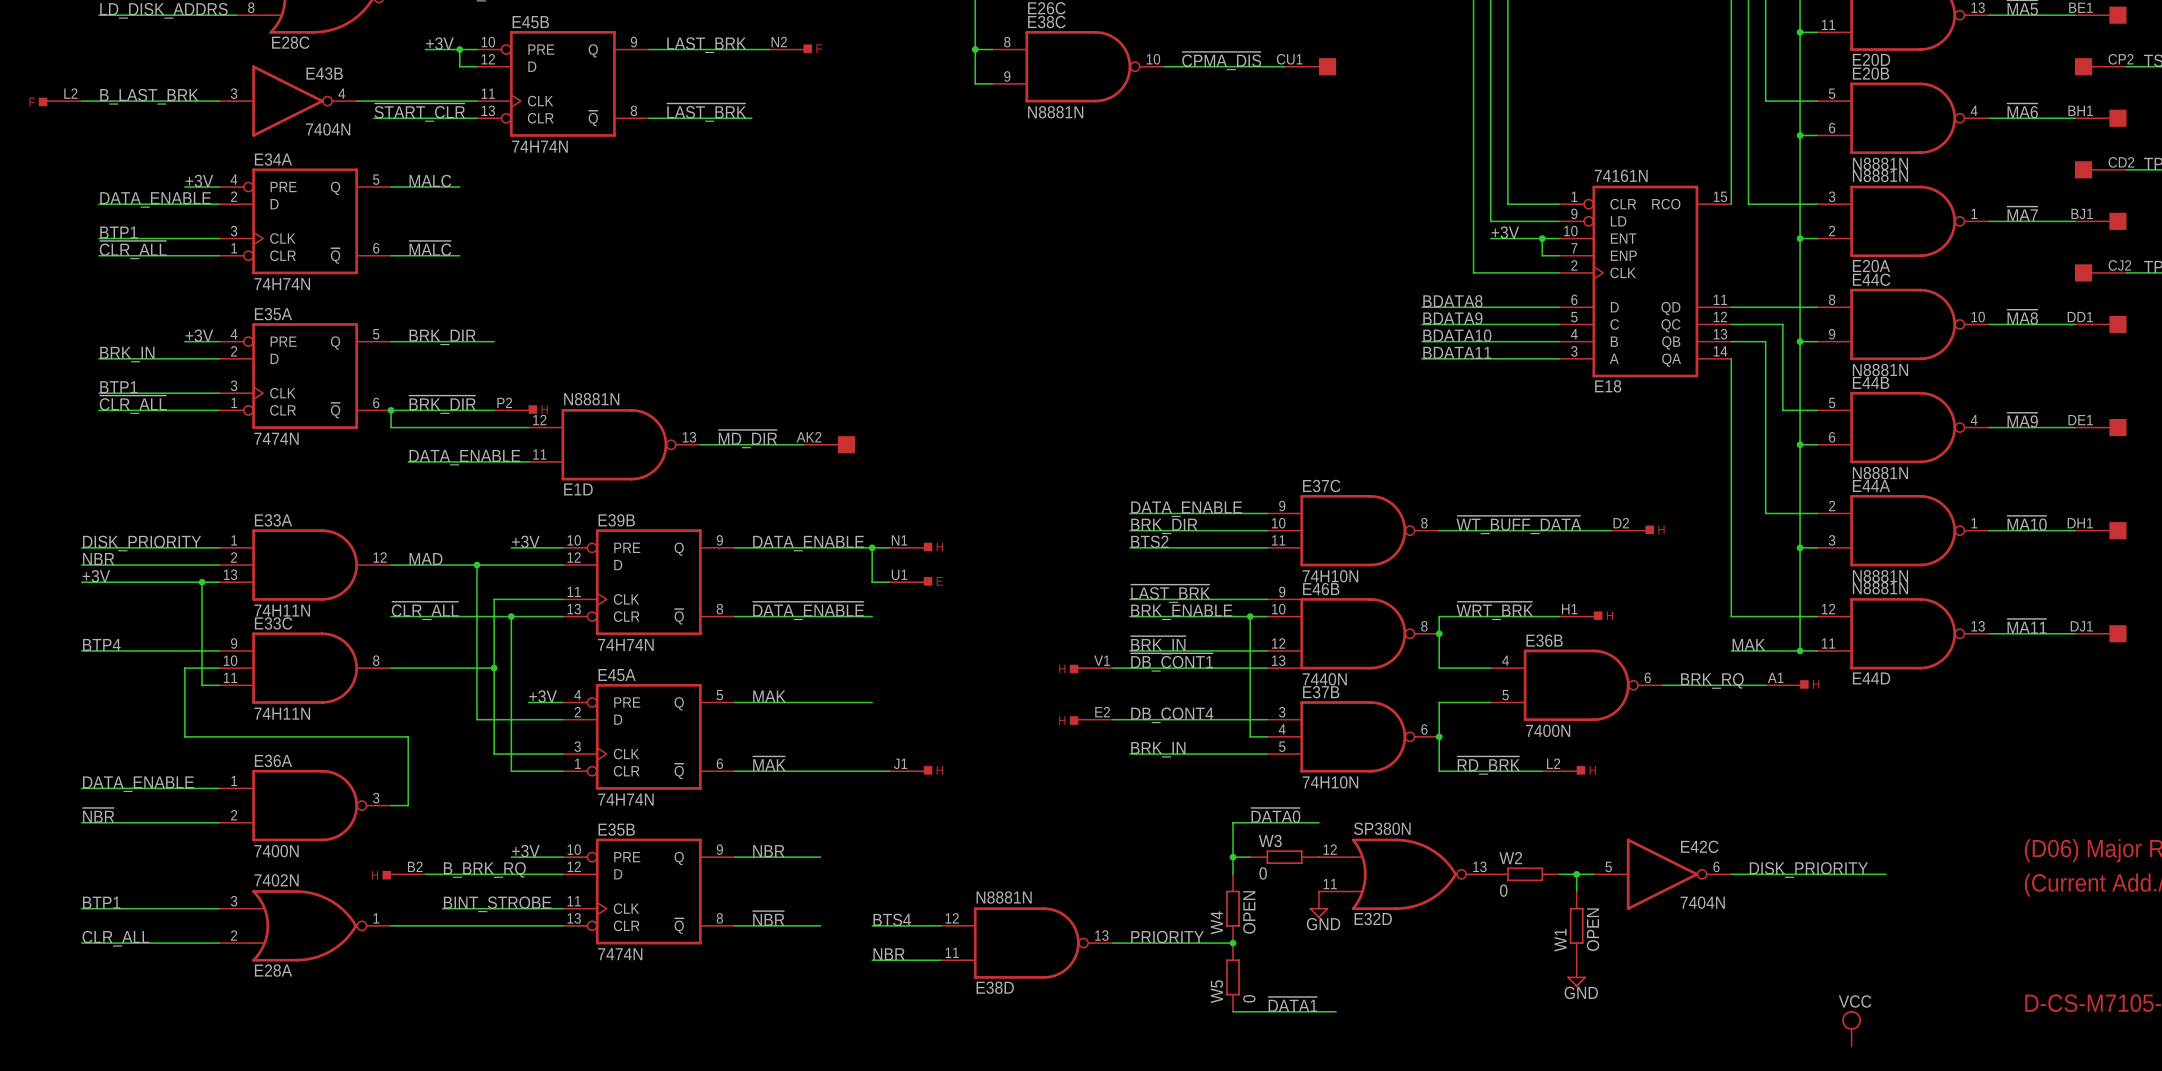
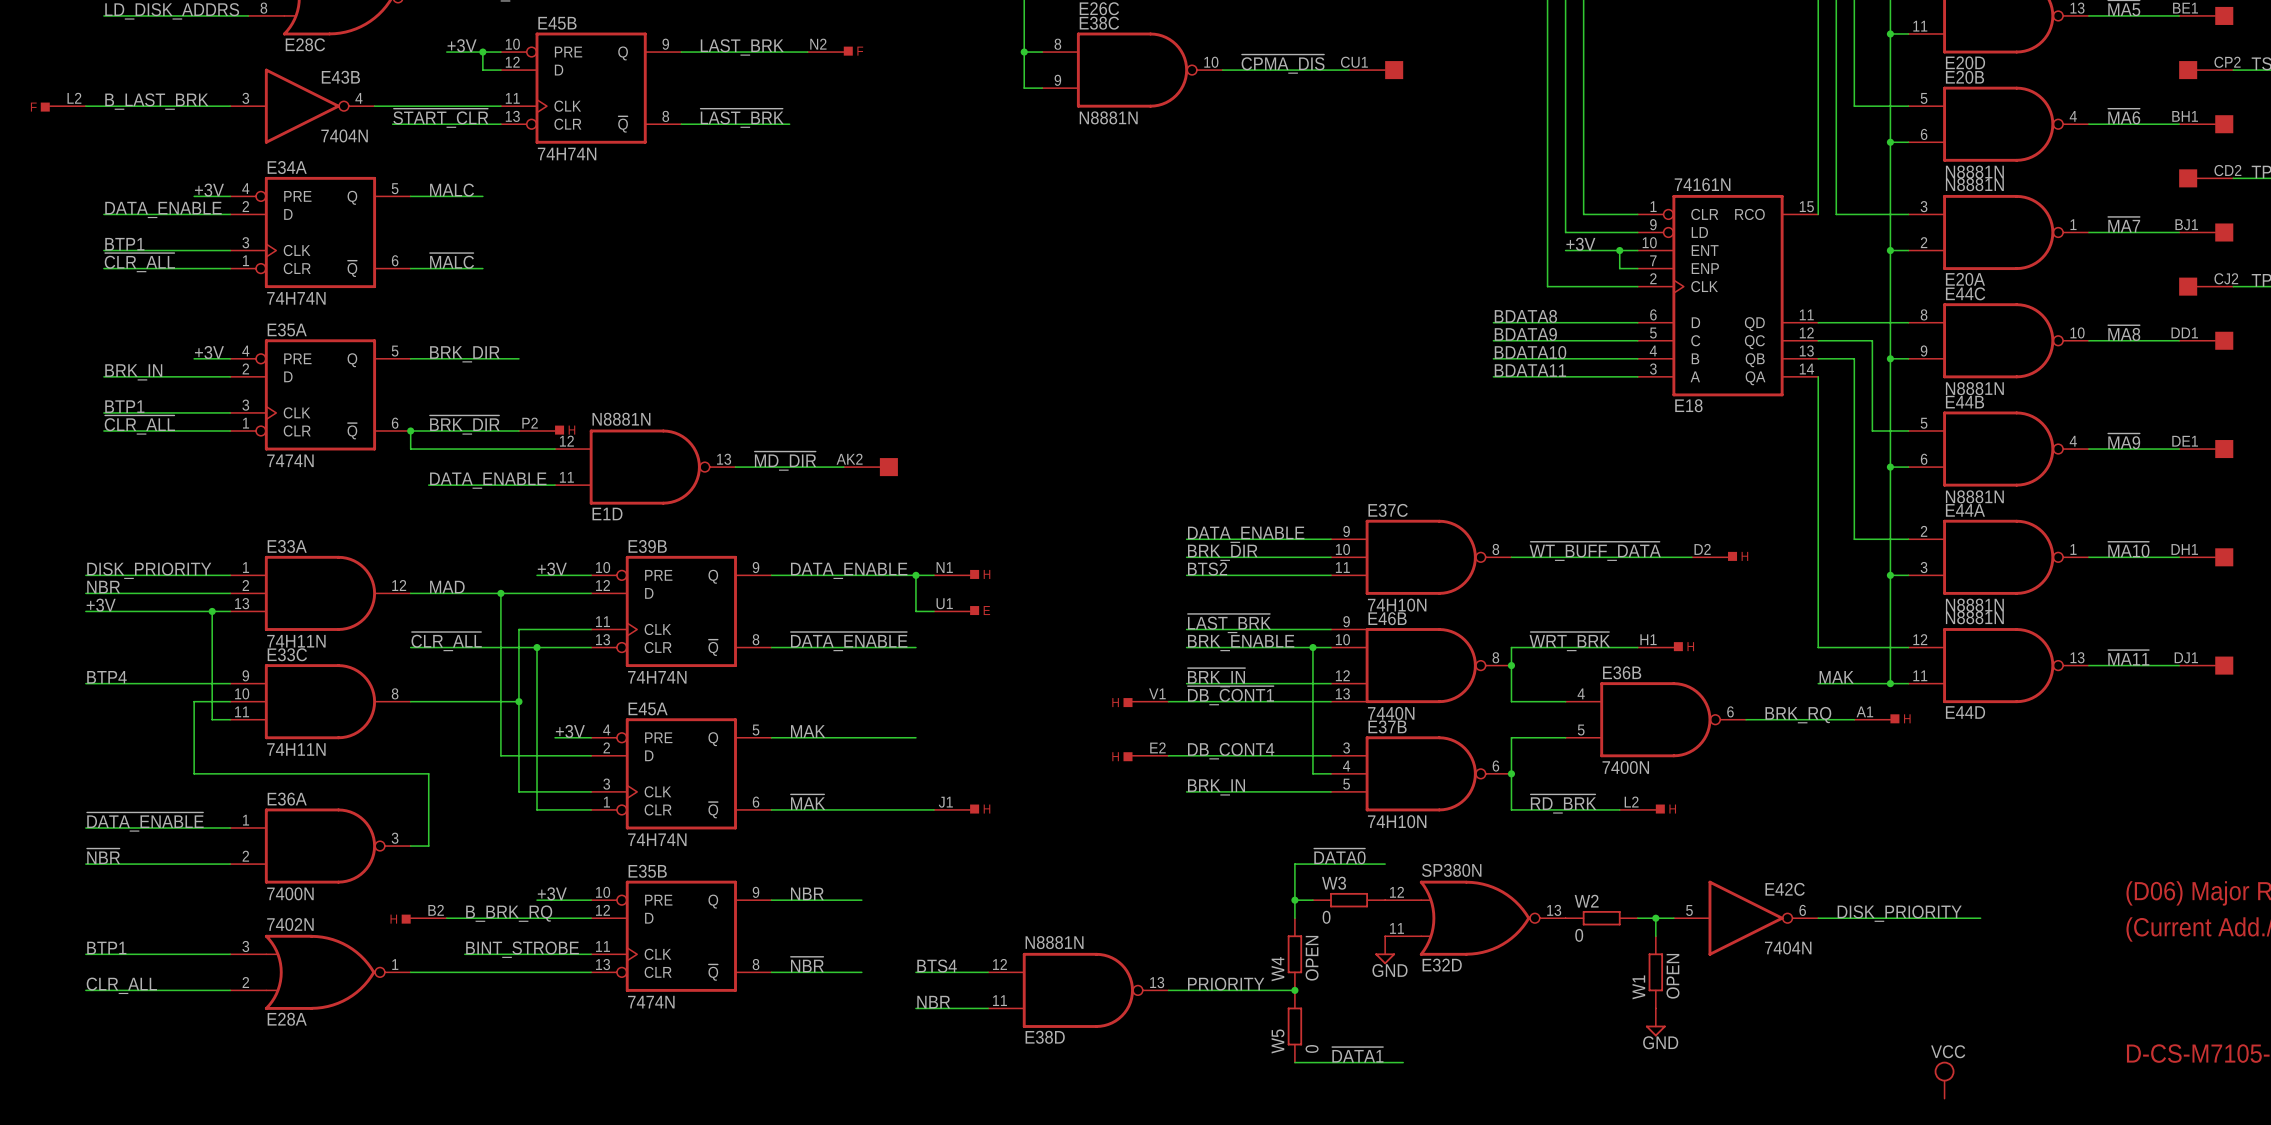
label: DATA_ENABLE (138, 784) -> ~{DATA_ENABLE} (145, 822)

